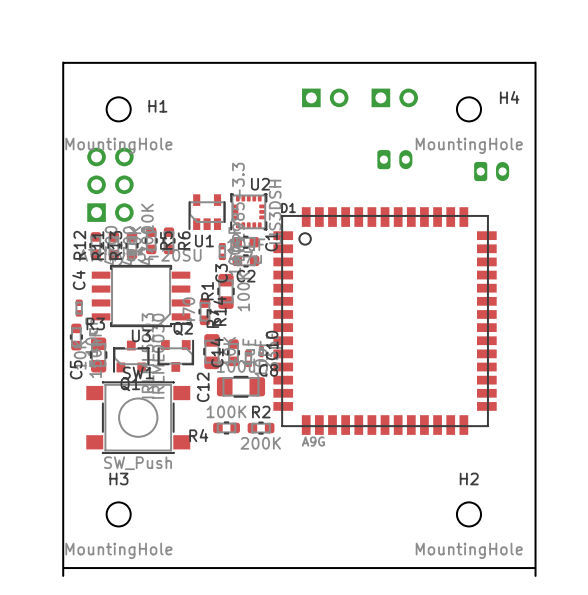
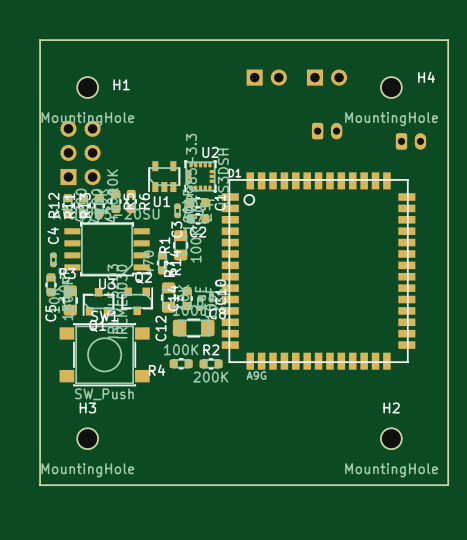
board edge: (63, 62) (63, 575) -> none
board edge: (63, 62) (534, 62) -> none
board edge: (535, 62) (535, 575) -> none
board edge: none -> (40, 485) (40, 40) (448, 40) (448, 485)

